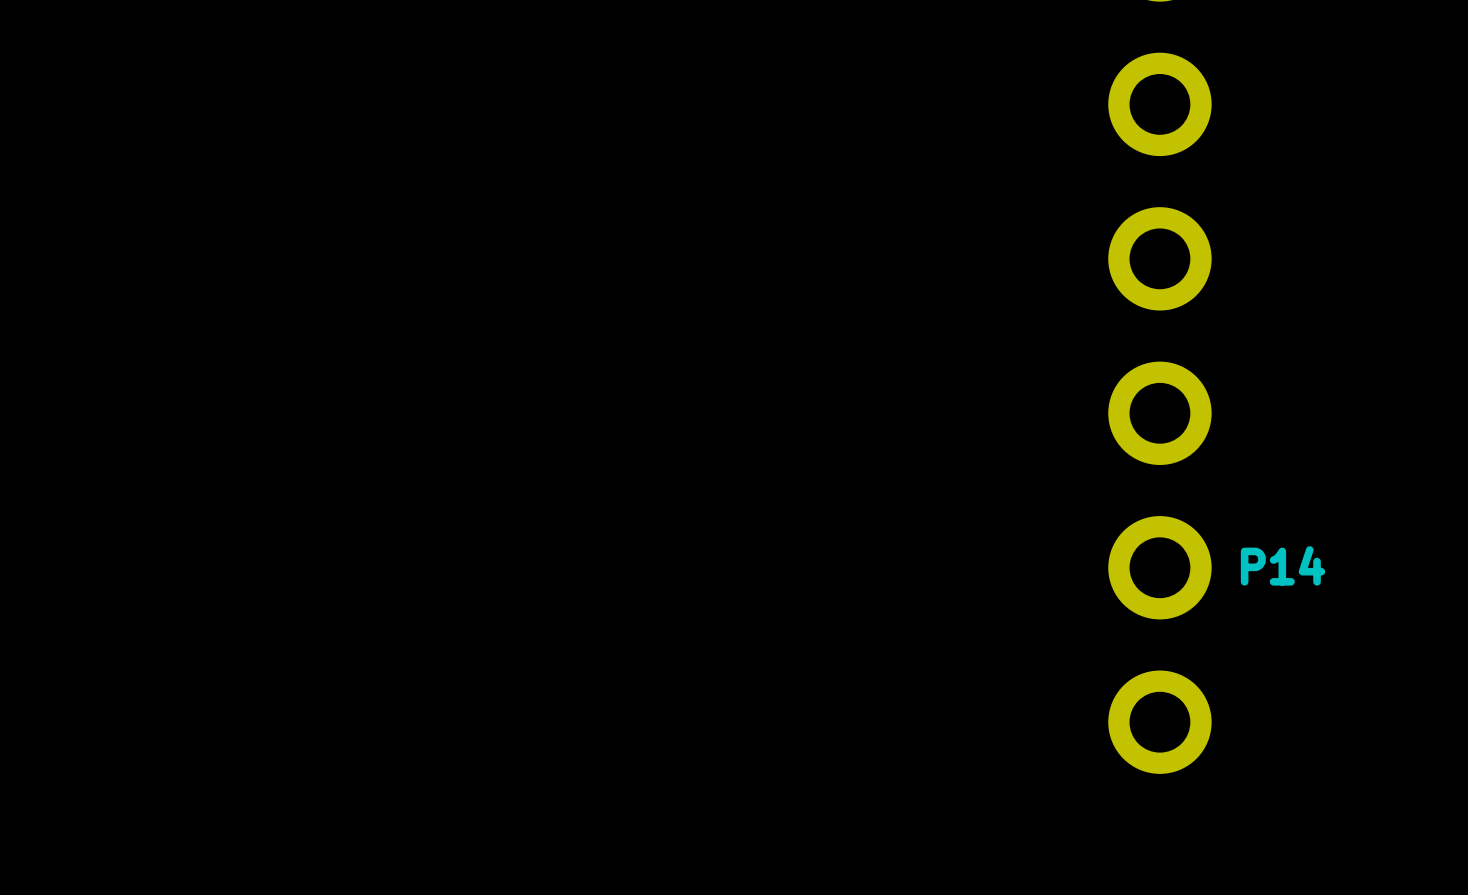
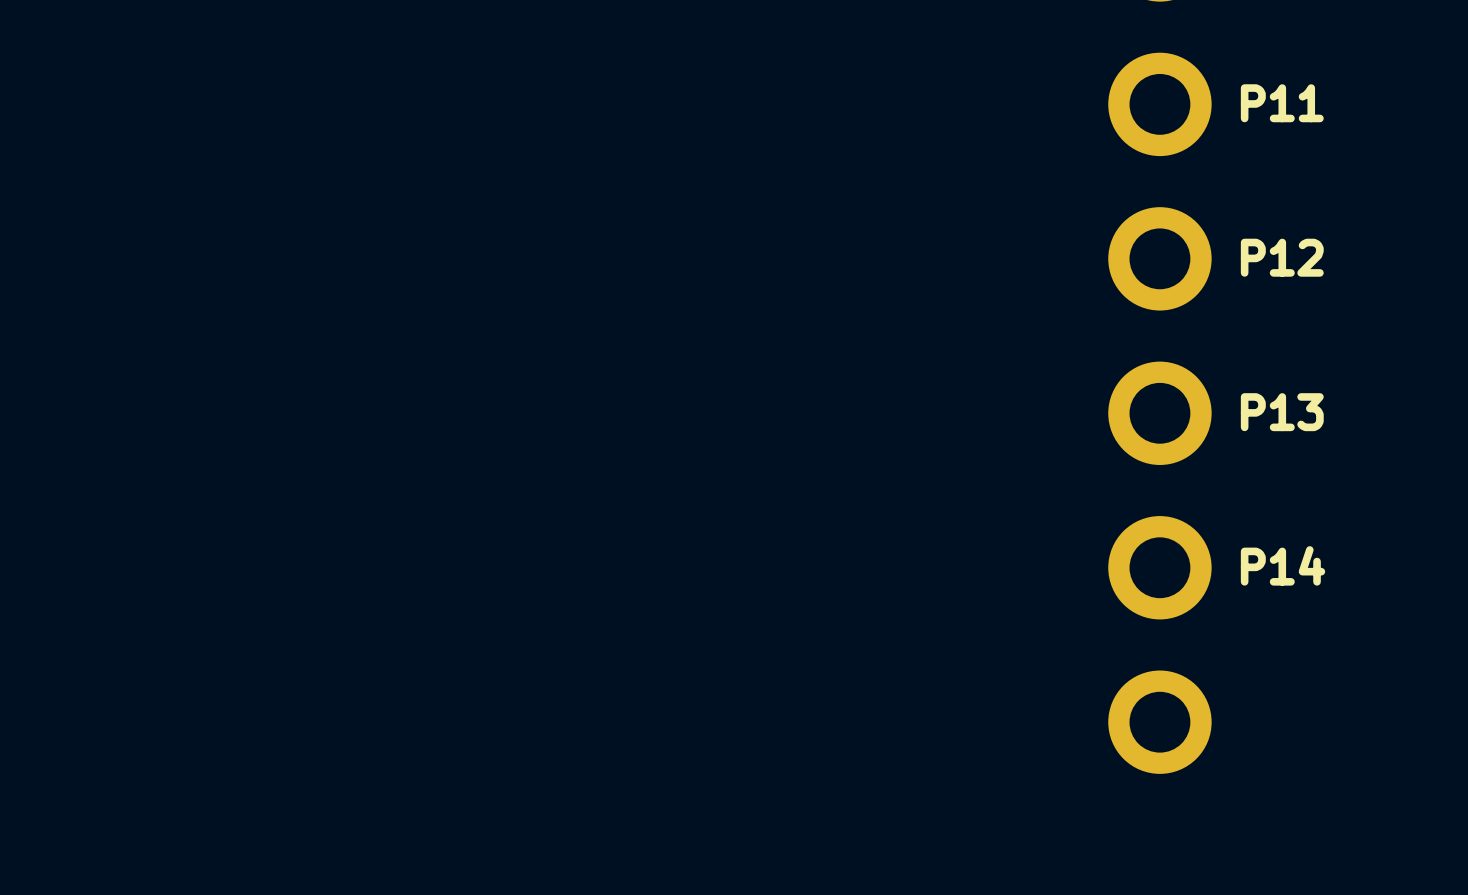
text: none -> P11 (1282, 103)
text: none -> P12 (1282, 257)
text: none -> P13 (1282, 412)

